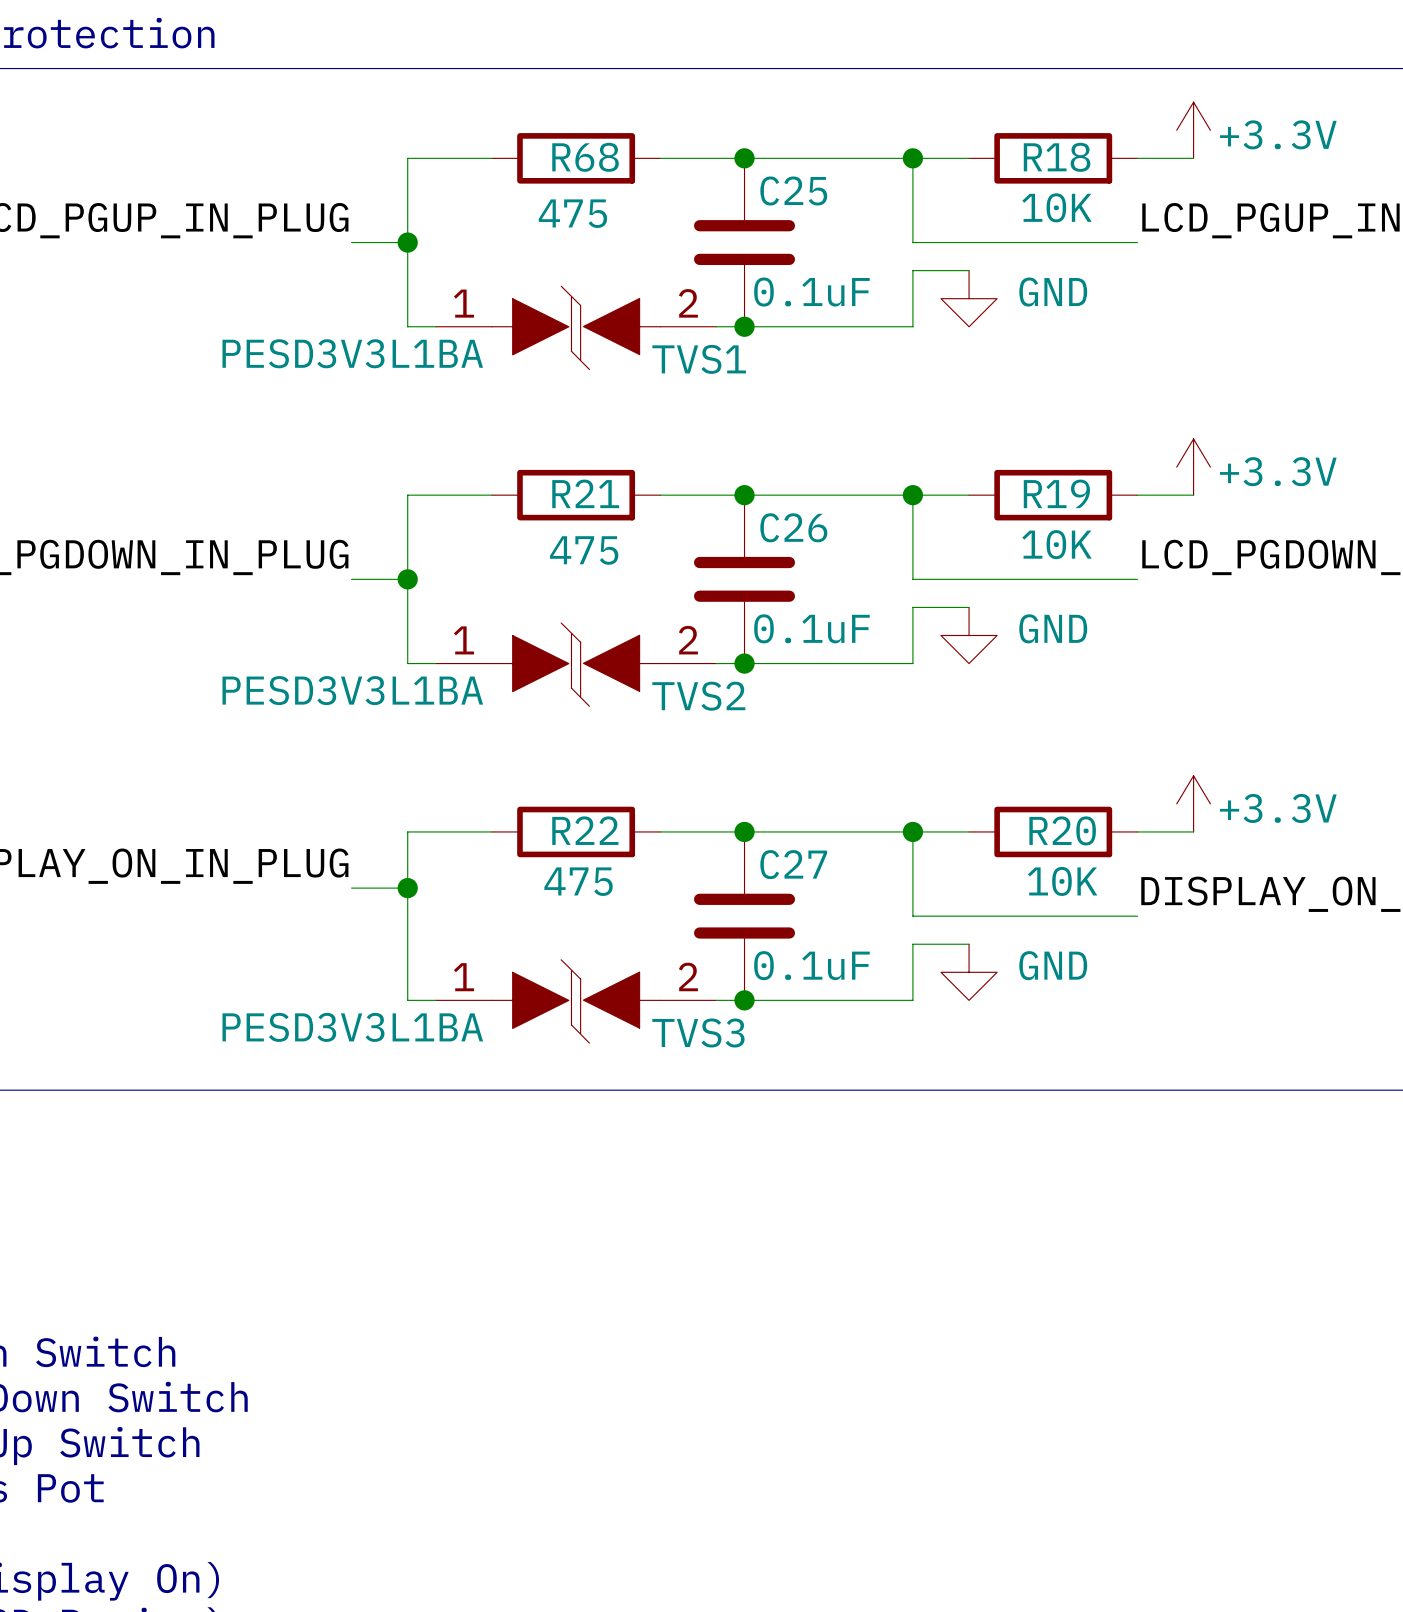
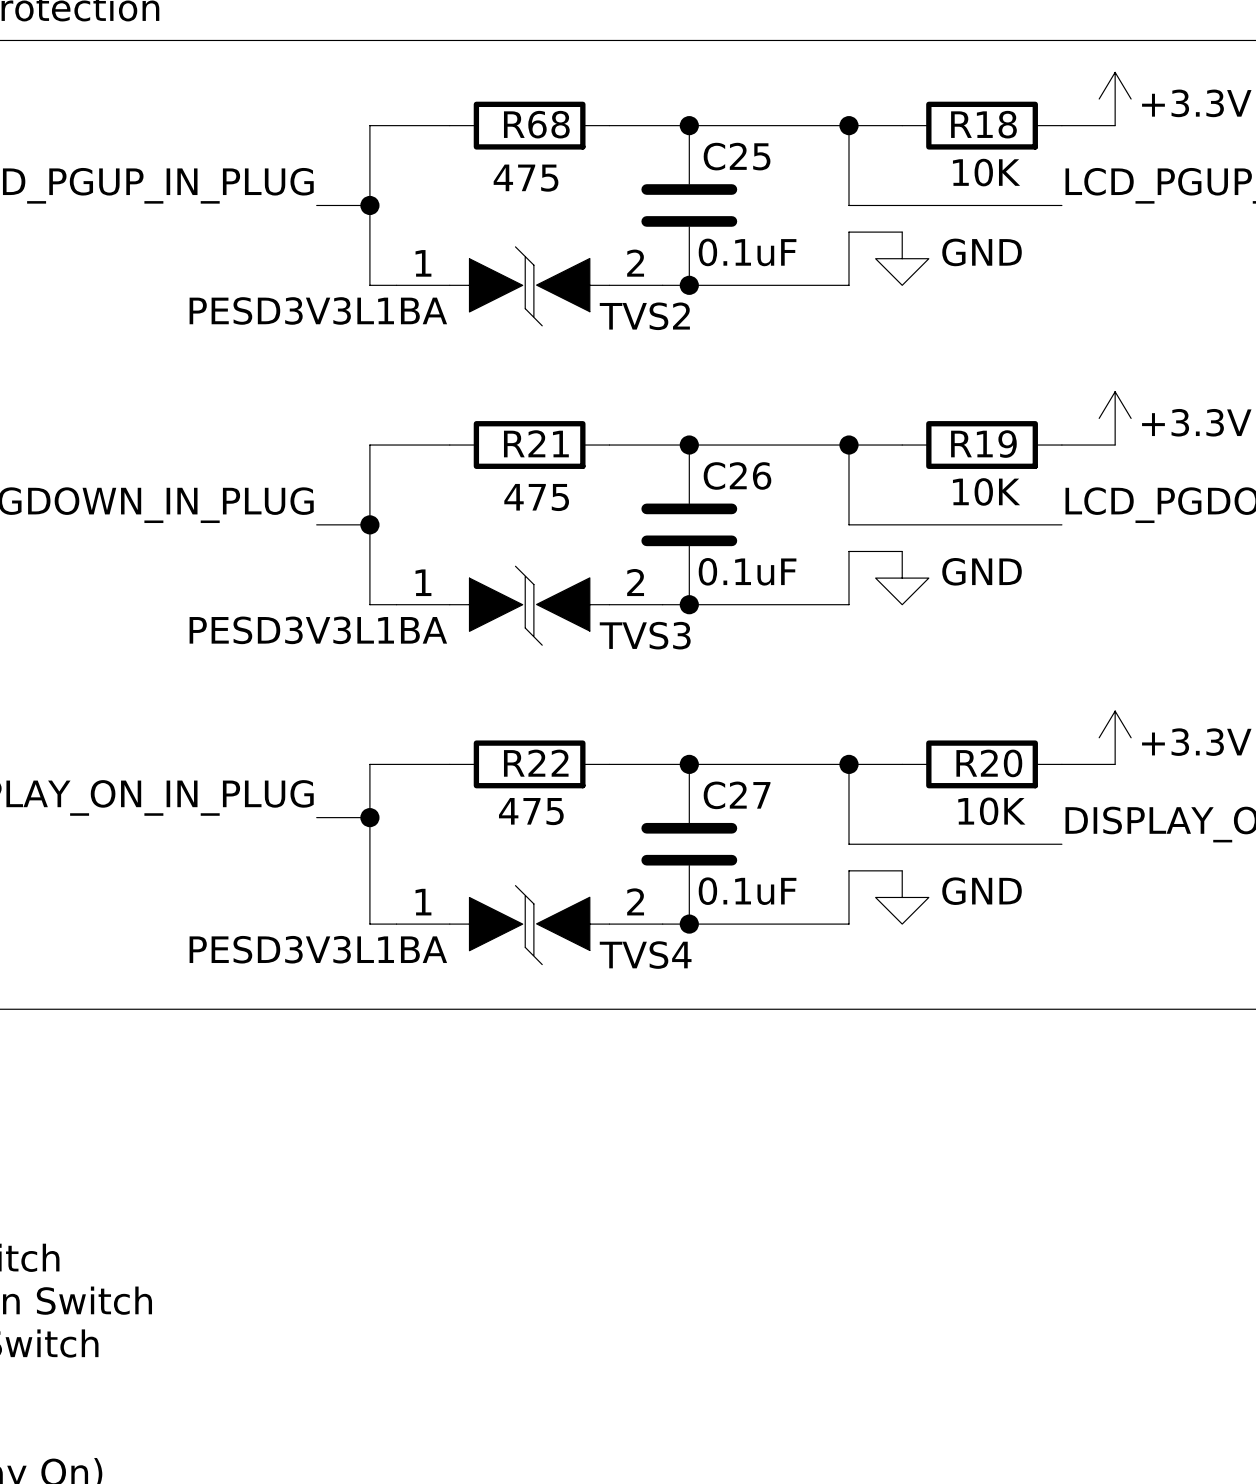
TVS1 name: TVS1 (699, 359) -> TVS2 (644, 316)
TVS2 name: TVS2 (698, 696) -> TVS3 (645, 635)
TVS3 name: TVS3 (698, 1033) -> TVS4 (645, 955)

